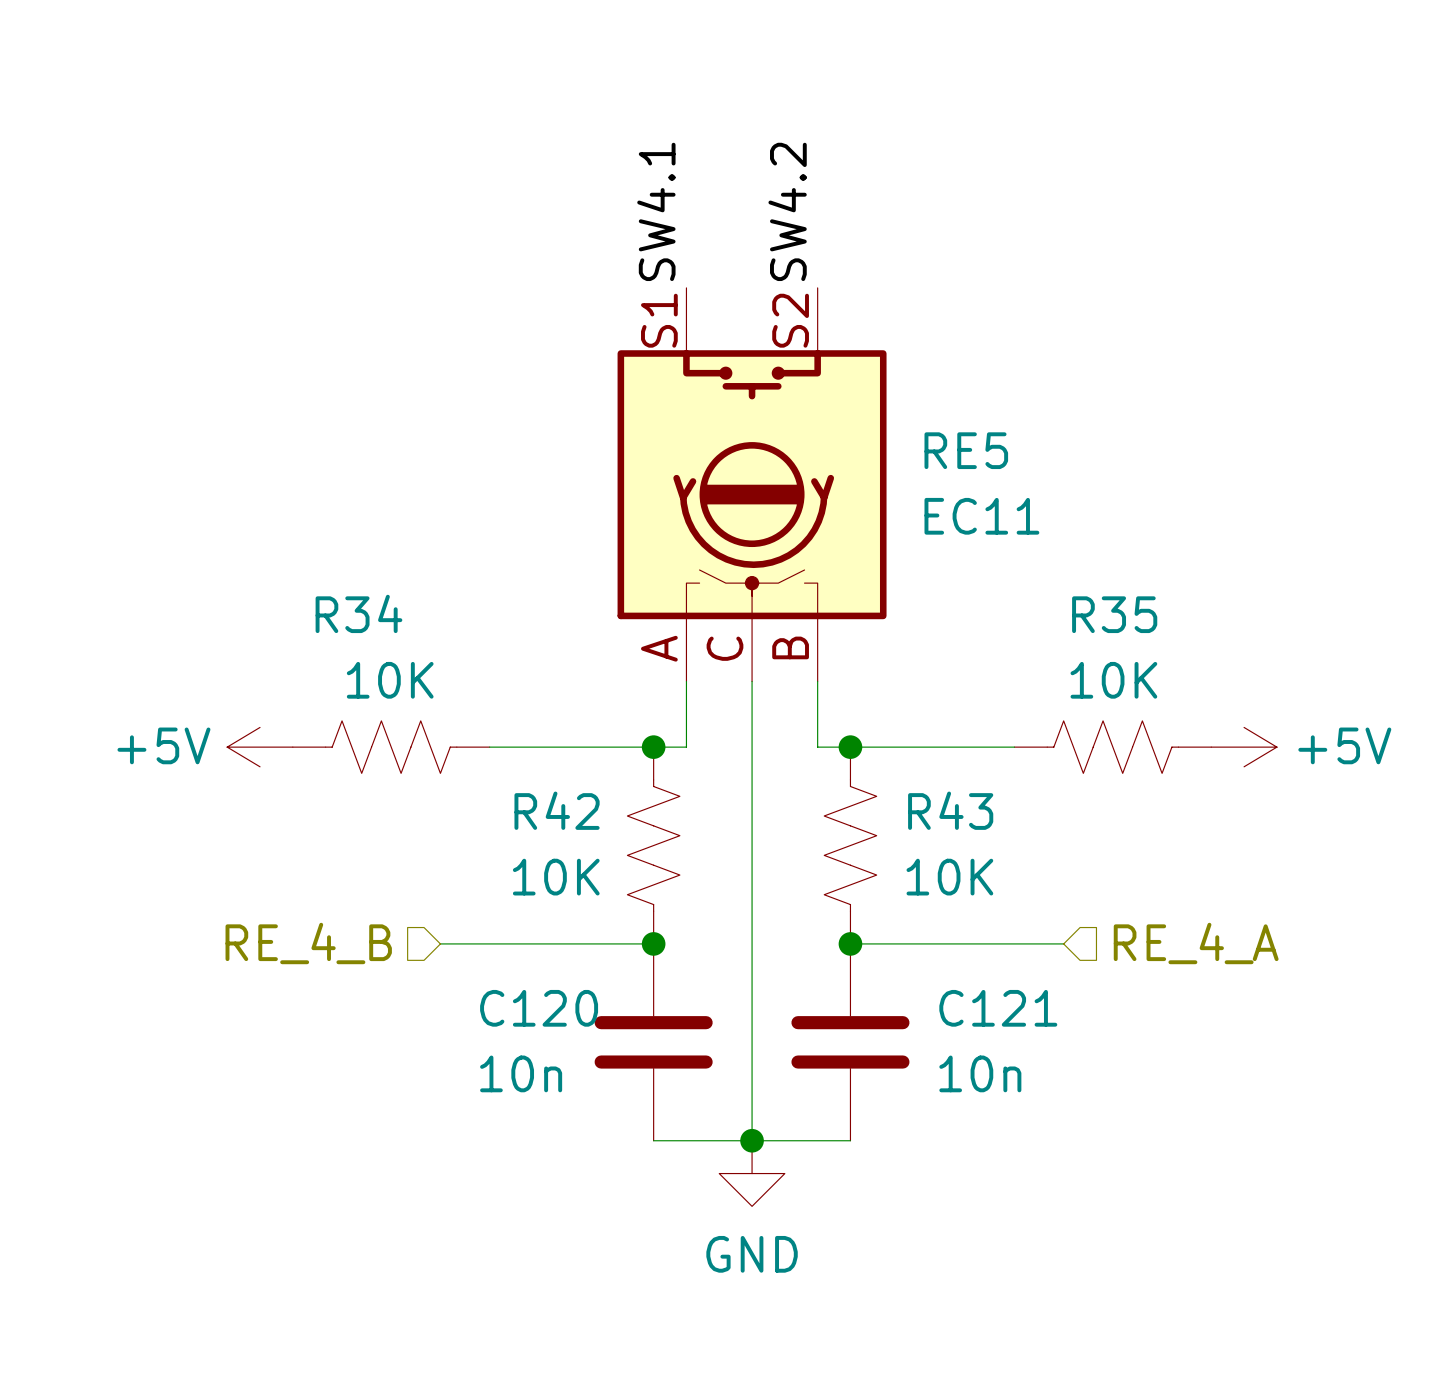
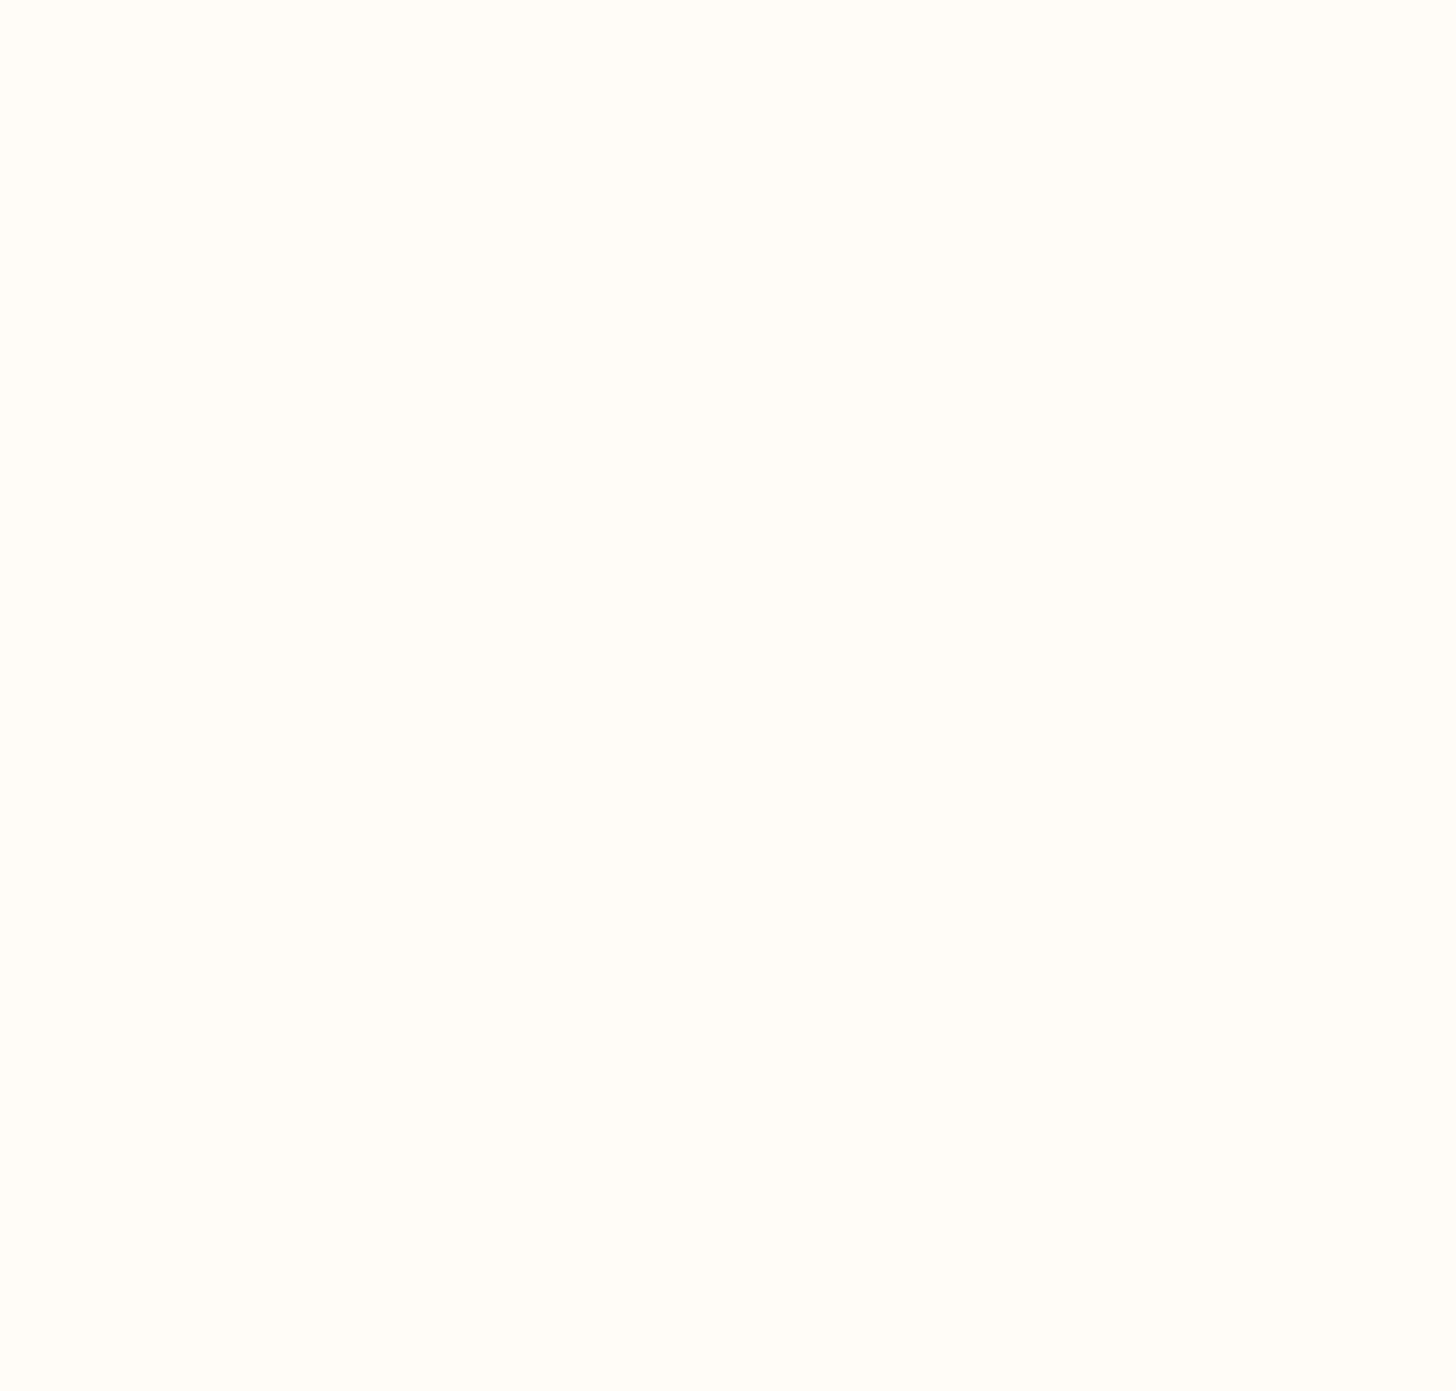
label: SW4.1 (656, 211) -> none
label: SW4.2 (787, 211) -> none
RE5: EC11 (752, 484) -> none
wire: (686, 681) (686, 747) (489, 747) -> none
wire: (752, 681) (752, 1140) -> none
wire: (817, 681) (817, 747) (1014, 747) -> none
power symbol: +5V (260, 747) -> none
R34: 10K (391, 747) -> none
junction: (653, 747) -> none
junction: (850, 747) -> none
R35: 10K (1112, 747) -> none
power symbol: +5V (1244, 747) -> none
R42: 10K (653, 845) -> none
R43: 10K (850, 845) -> none
hierarchical label: RE_4_B (308, 943) -> none
wire: (440, 943) (653, 943) -> none
junction: (653, 943) -> none
wire: (850, 943) (1063, 943) -> none
junction: (850, 943) -> none
hierarchical label: RE_4_A (1196, 943) -> none
C120: 10n (653, 1042) -> none
C121: 10n (850, 1042) -> none
wire: (653, 1140) (850, 1140) -> none
junction: (752, 1140) -> none
power symbol: GND (752, 1173) -> none

